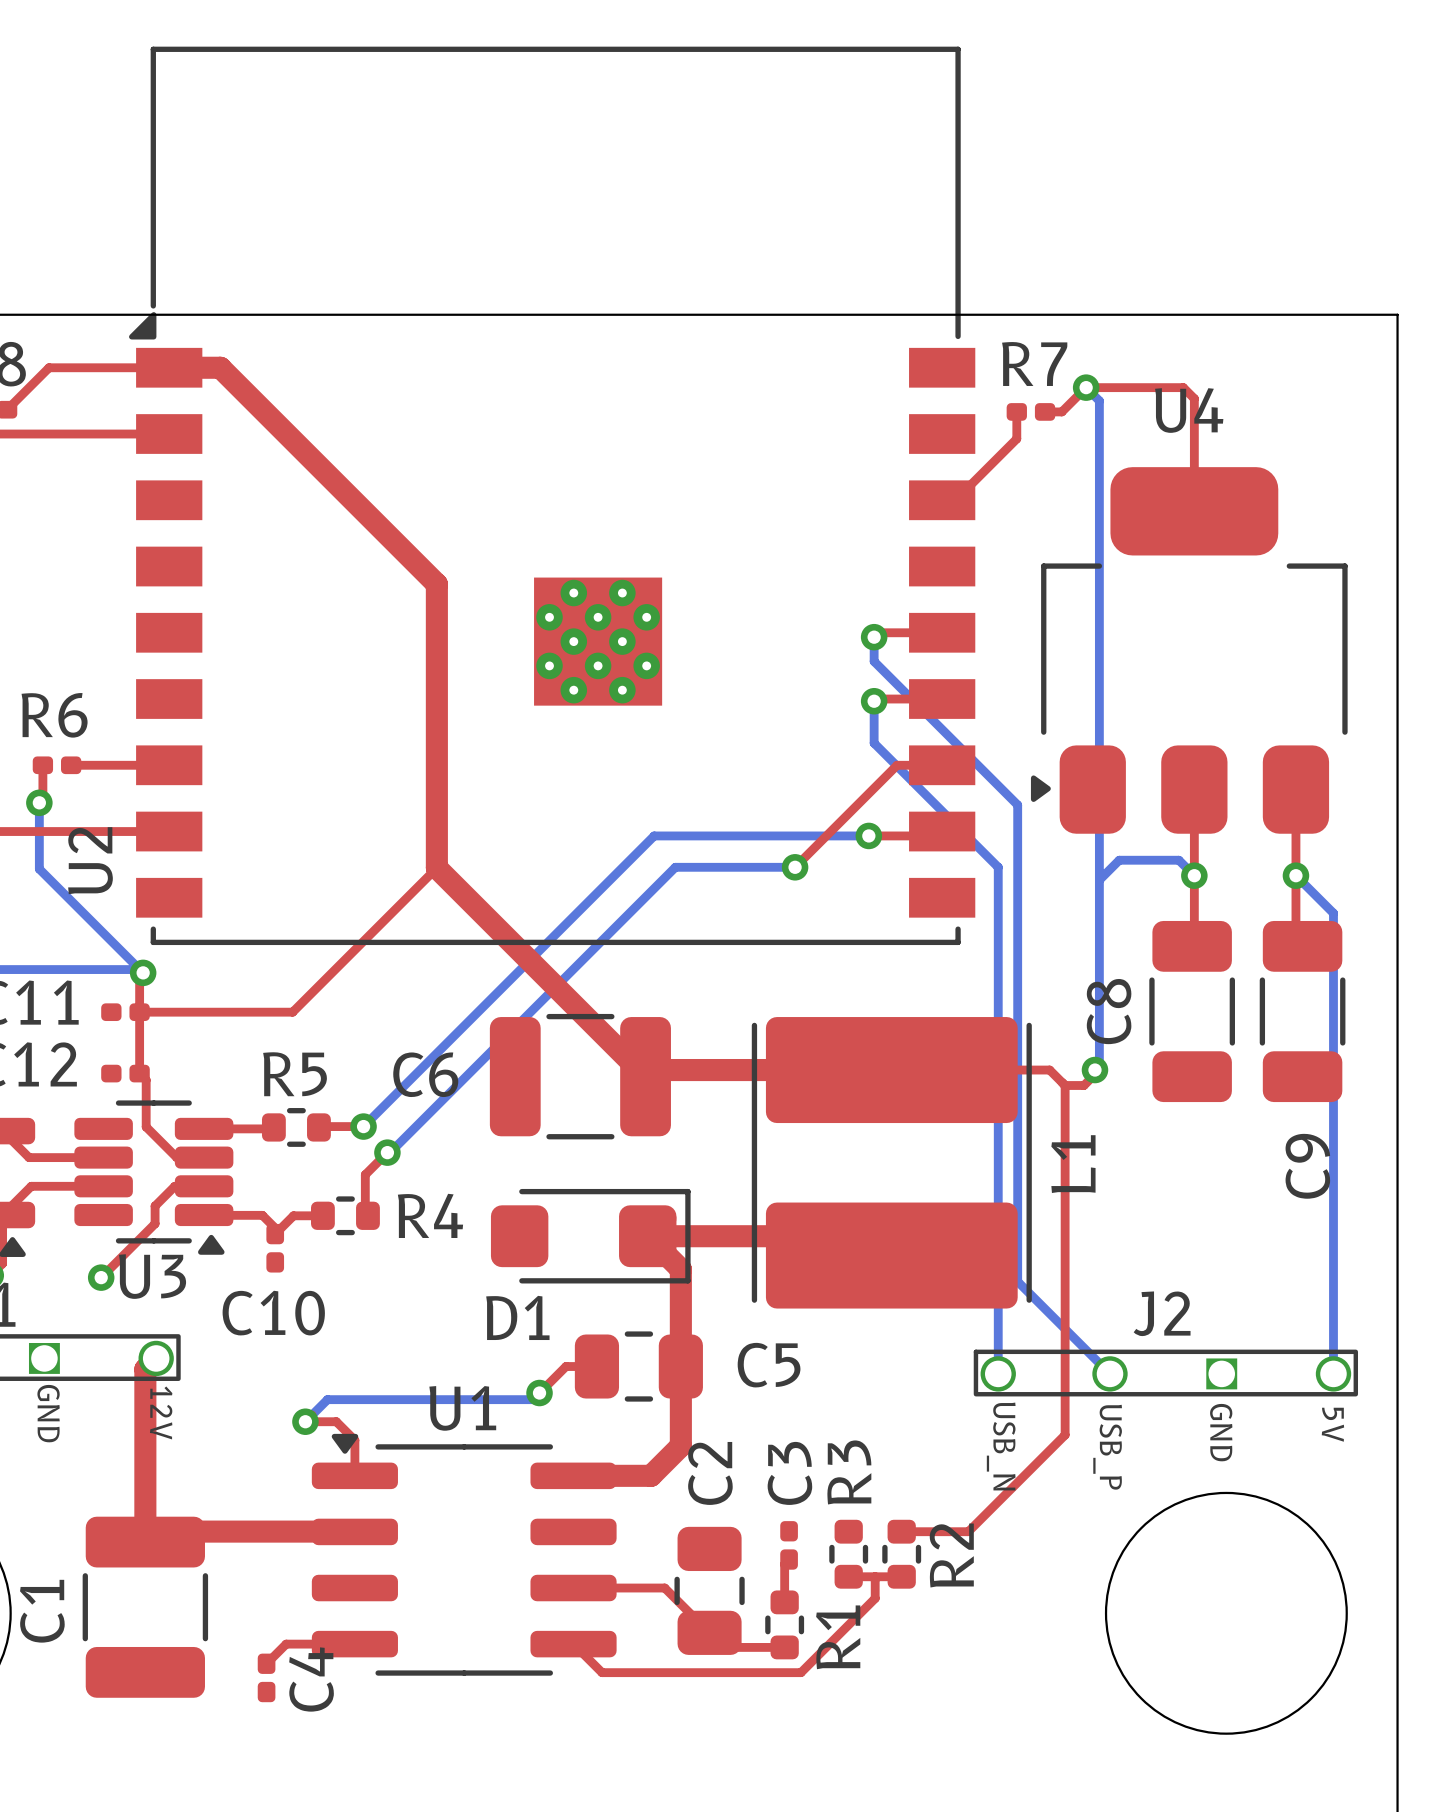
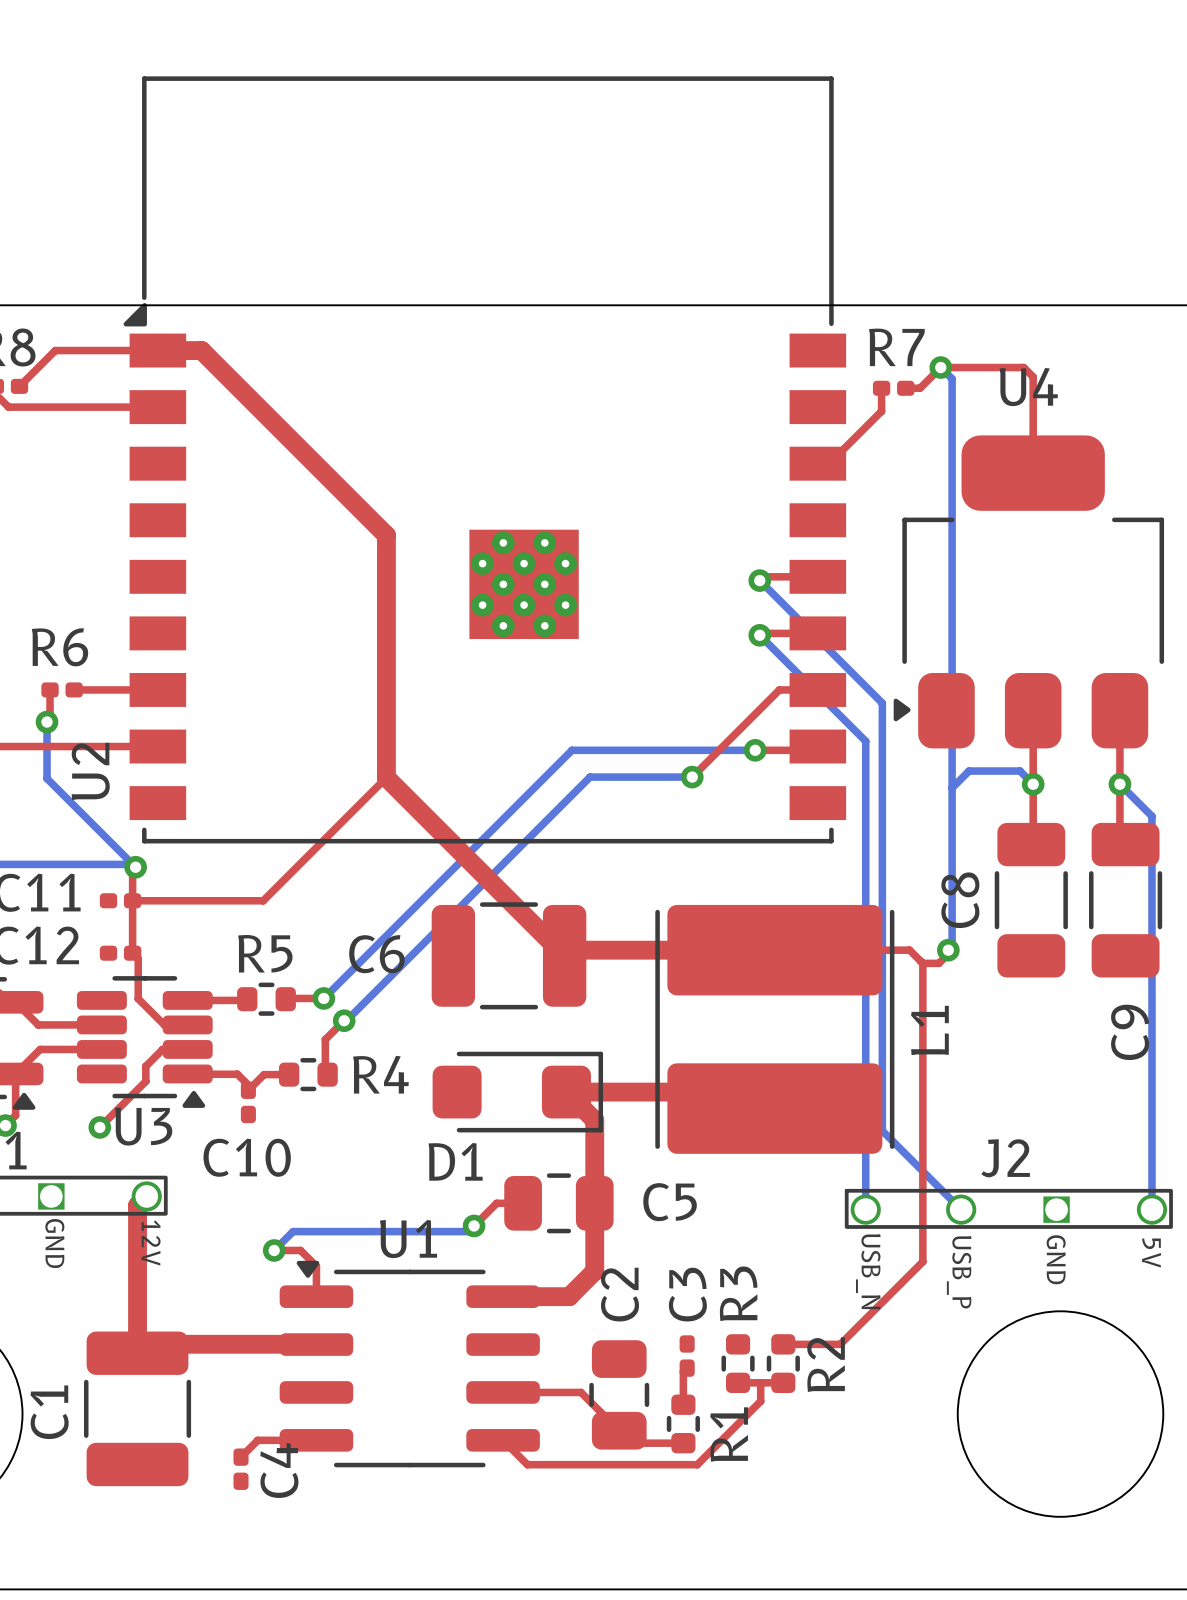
bottom track: (874, 637) (874, 661) (1017, 805) -> (759, 580) (882, 703) (882, 723)
bottom track: (874, 701) (874, 743) (998, 867) -> (759, 635) (865, 741) (865, 777)

